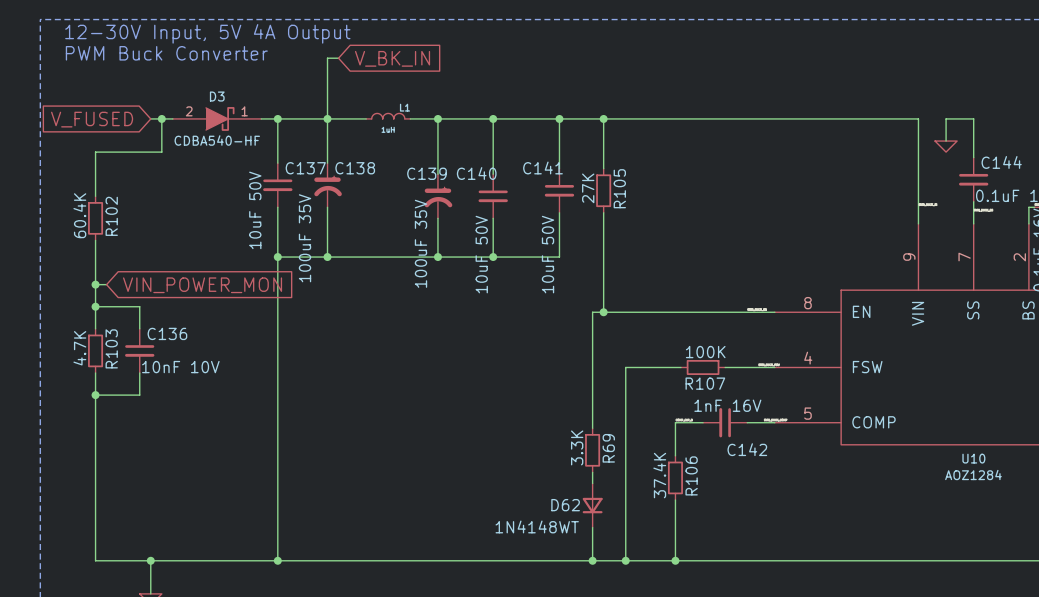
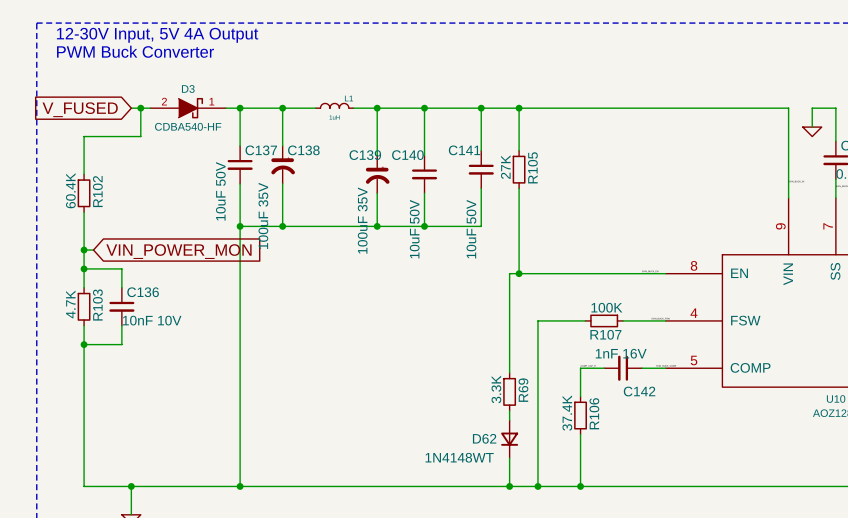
wire: (338, 58) (327, 58) (327, 118) -> none
global label: V_BK_IN (392, 58) -> none

